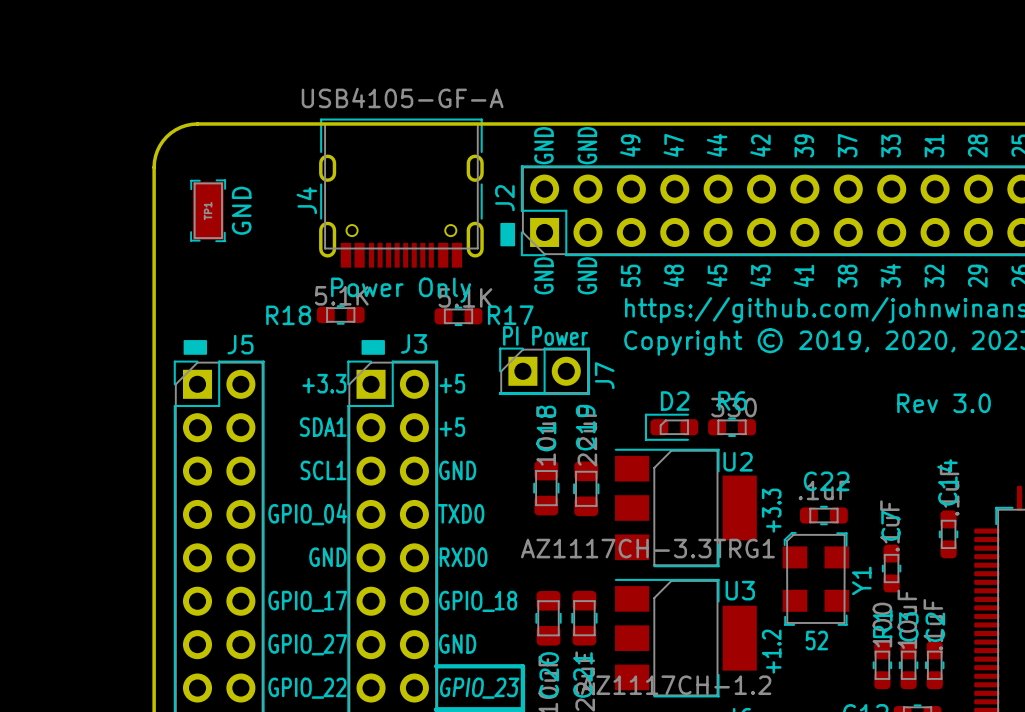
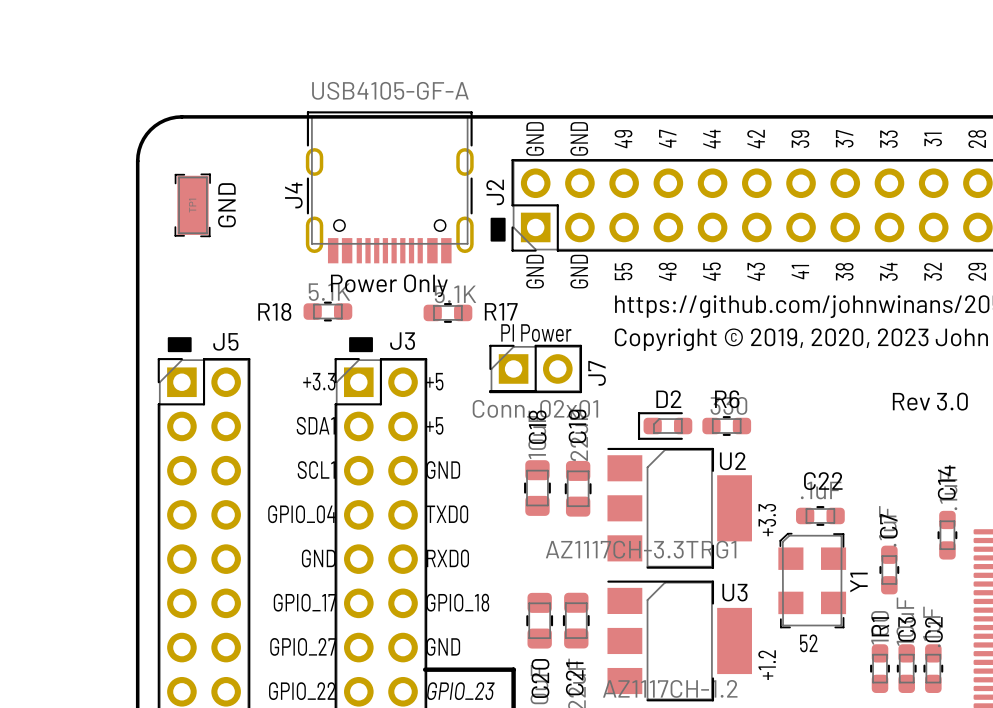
J7 value: none -> Conn_02x01 (535, 408)

